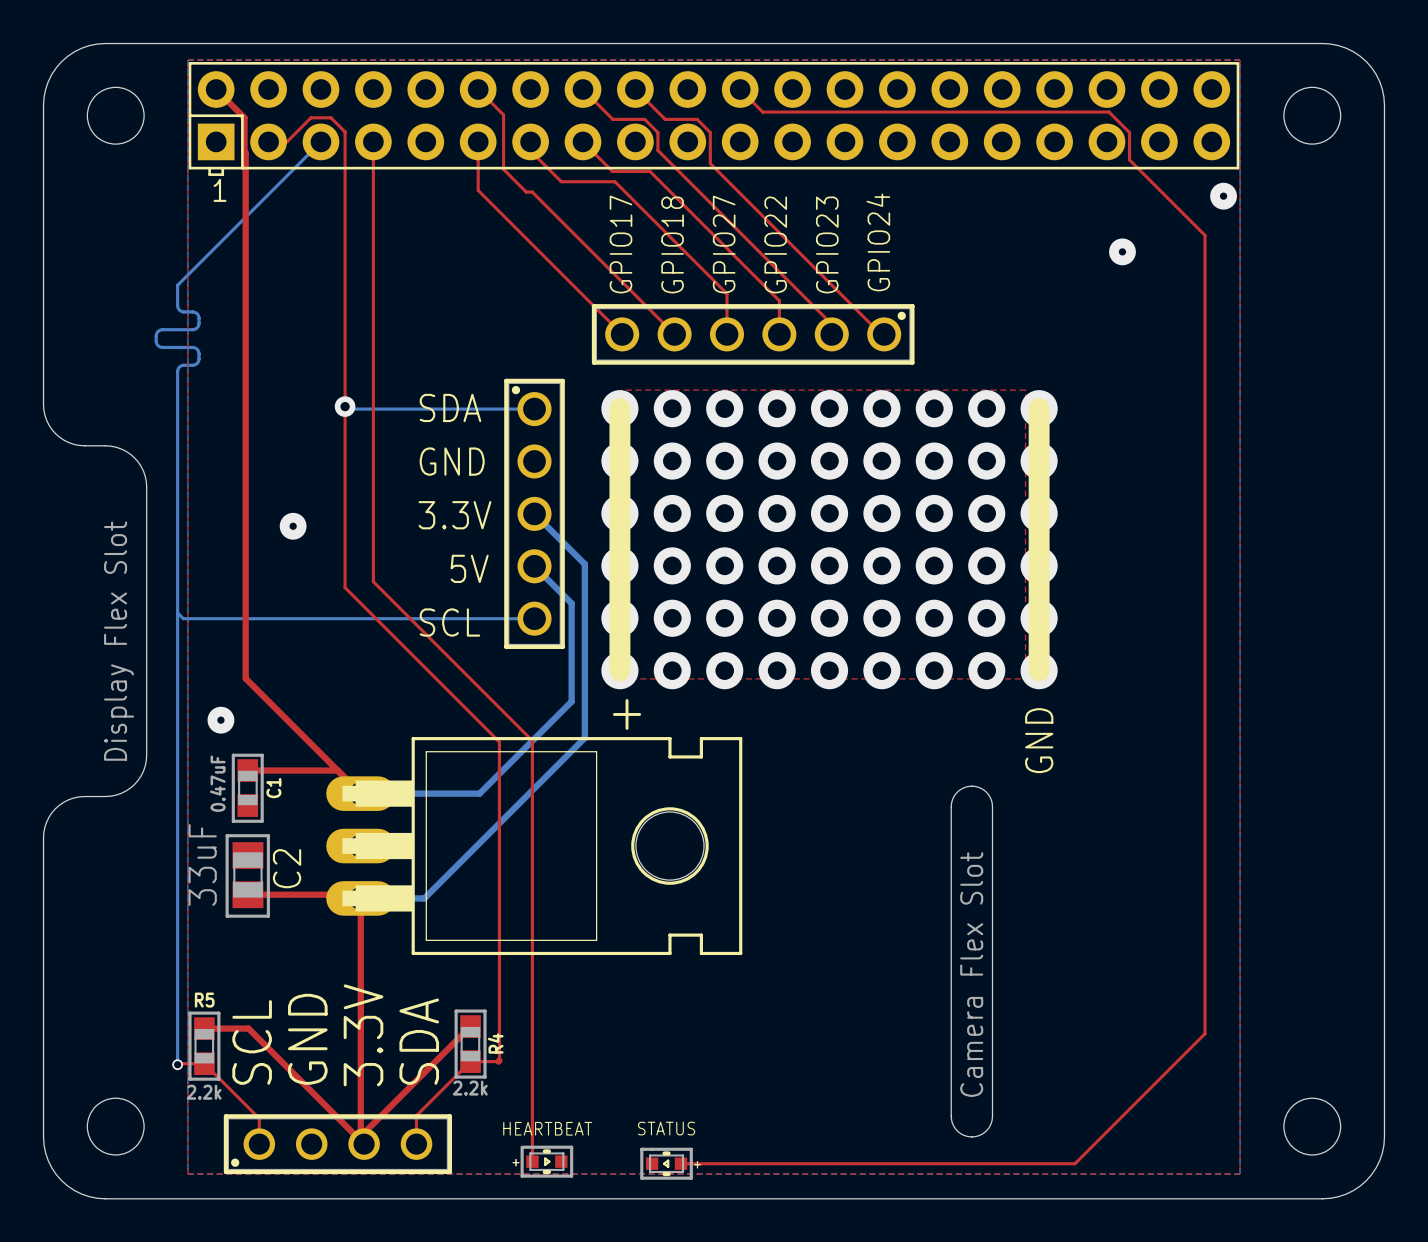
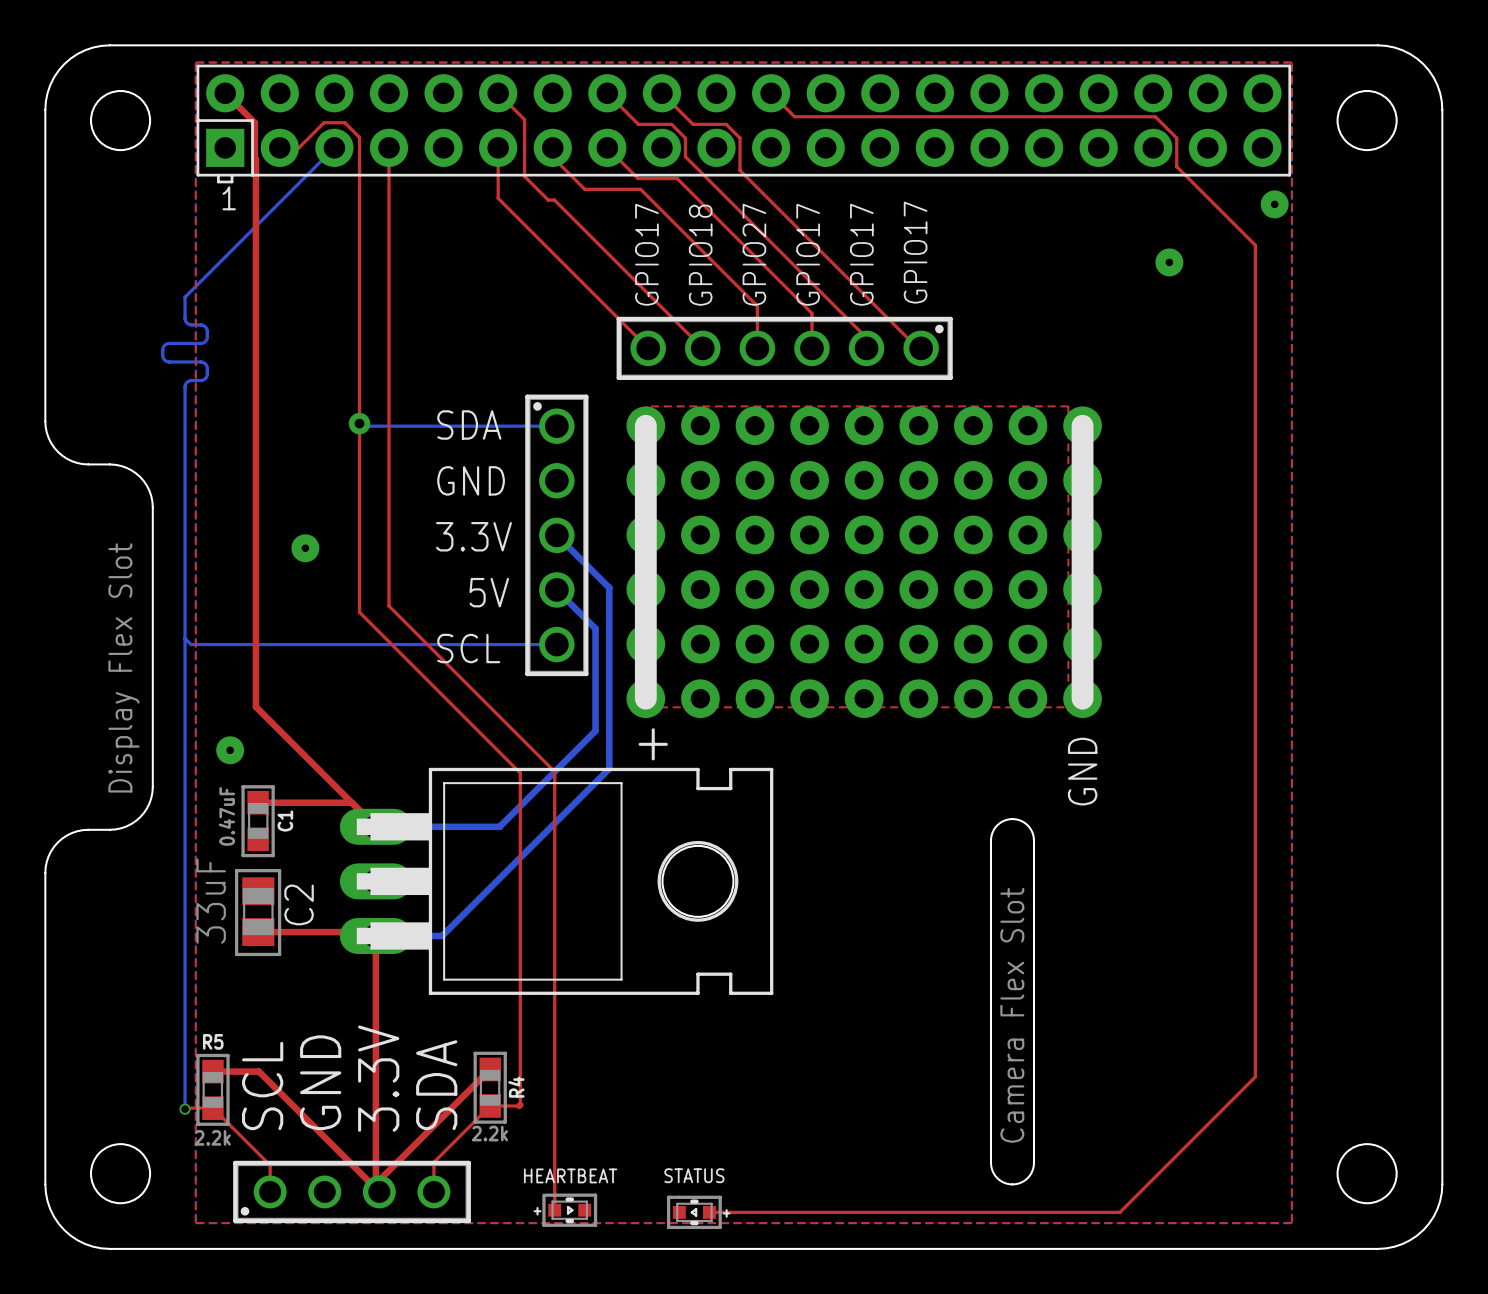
text: GPIO24 (878, 242) -> GPIO17 (915, 252)
text: GPIO22 (775, 244) -> GPIO17 (808, 254)
text: GPIO23 (827, 244) -> GPIO17 (861, 254)

